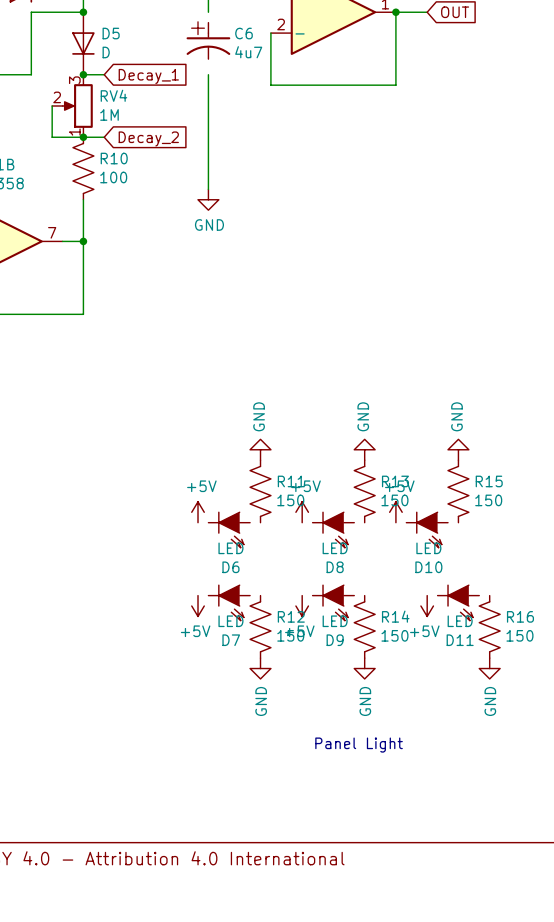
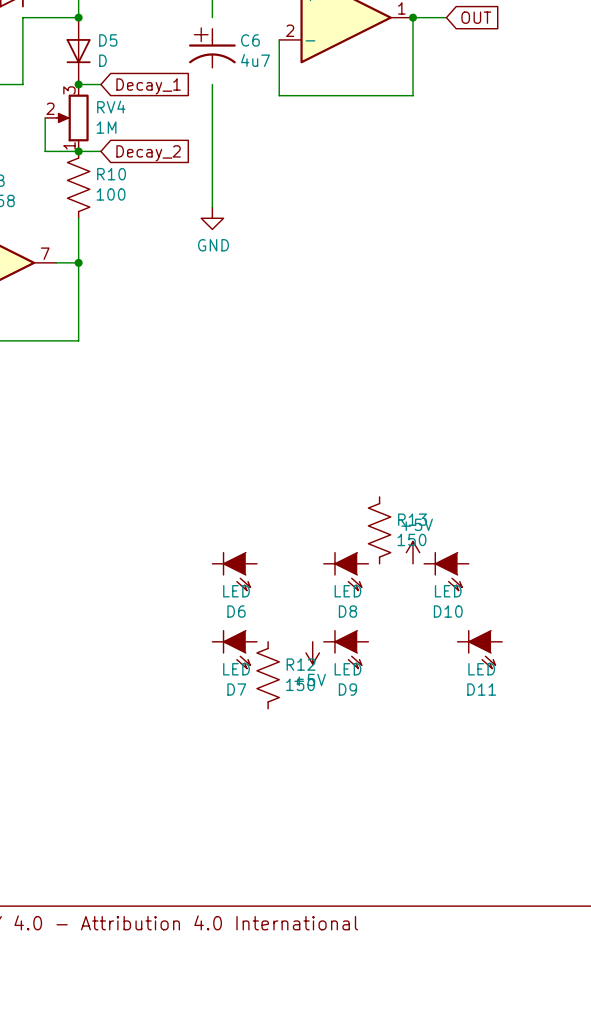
power symbol: GND (260, 449) -> none
power symbol: GND (364, 449) -> none
power symbol: GND (458, 449) -> none
R11: 150 (260, 491) -> none
R15: 150 (458, 491) -> none
power symbol: +5V (198, 512) -> none
power symbol: +5V (302, 512) -> none
power symbol: +5V (198, 606) -> none
power symbol: +5V (427, 606) -> none
R14: 150 (364, 626) -> none
R16: 150 (489, 626) -> none
power symbol: GND (260, 668) -> none
power symbol: GND (364, 668) -> none
power symbol: GND (489, 668) -> none
text: Panel Light (359, 745) -> none

